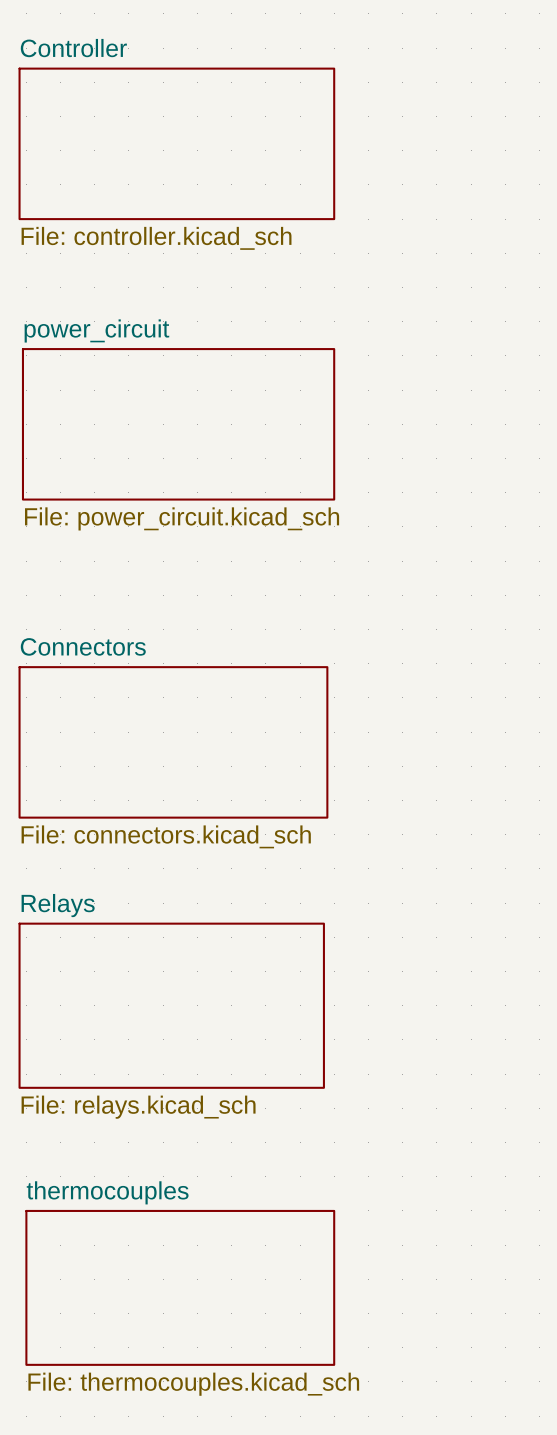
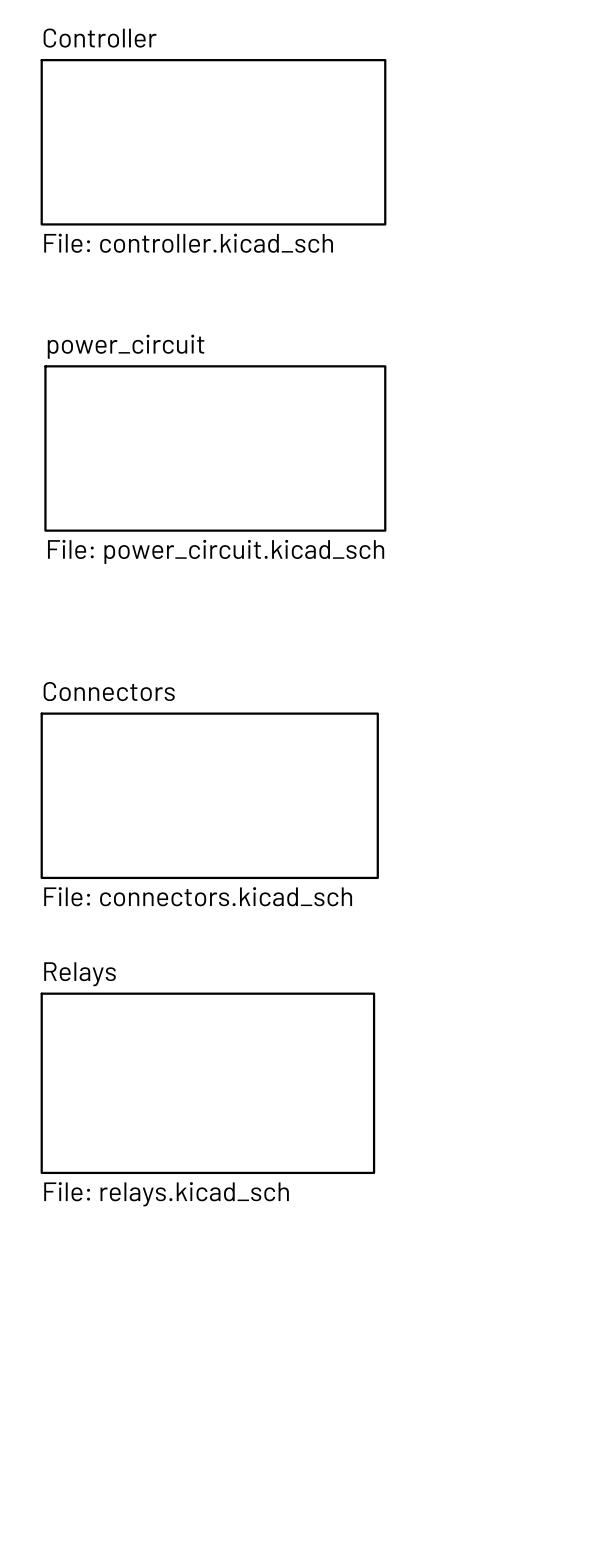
sheet thermocouples: File: thermocouples.kicad_sch (180, 1287) -> none

